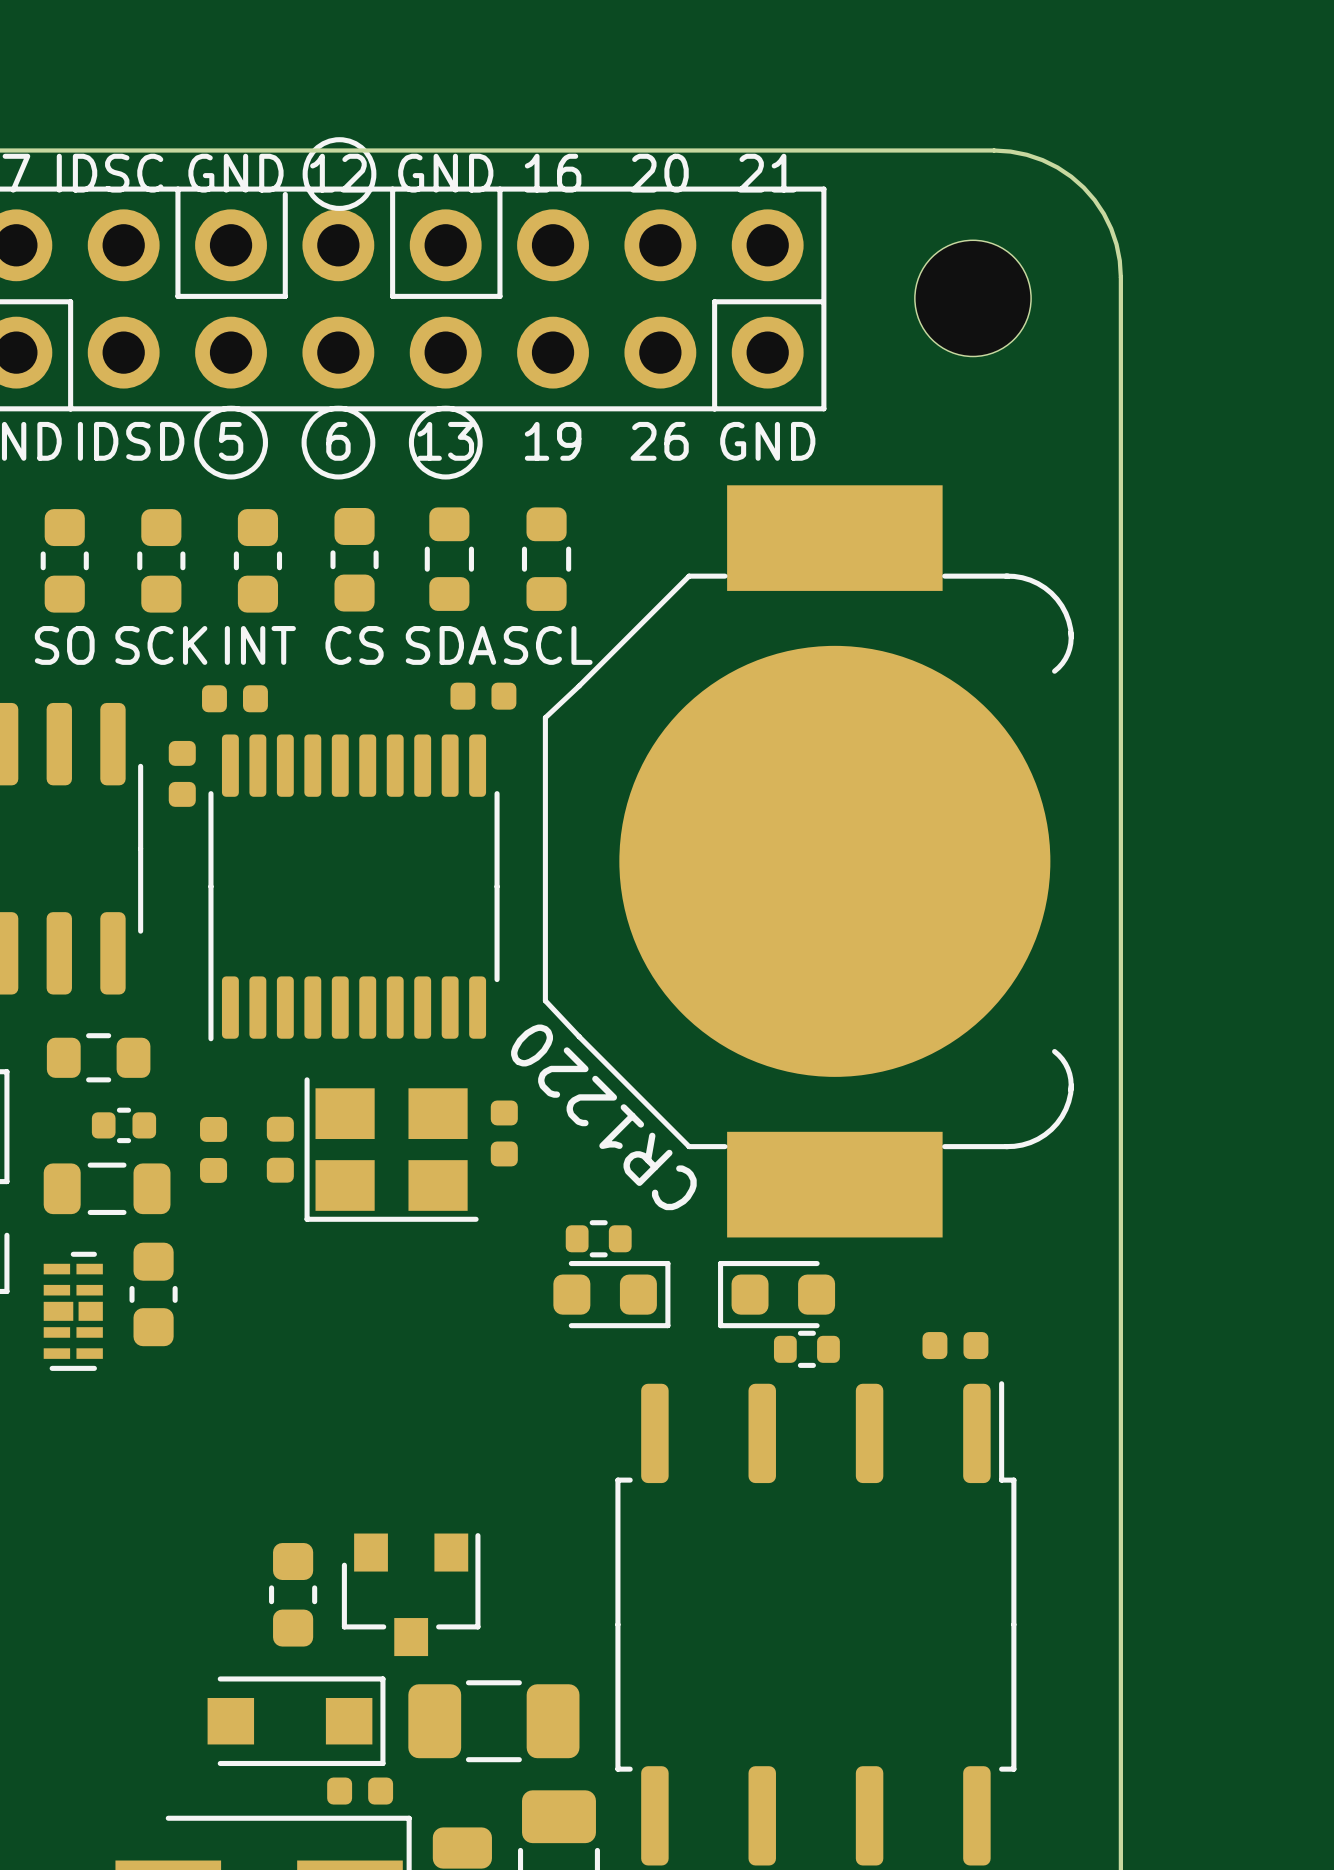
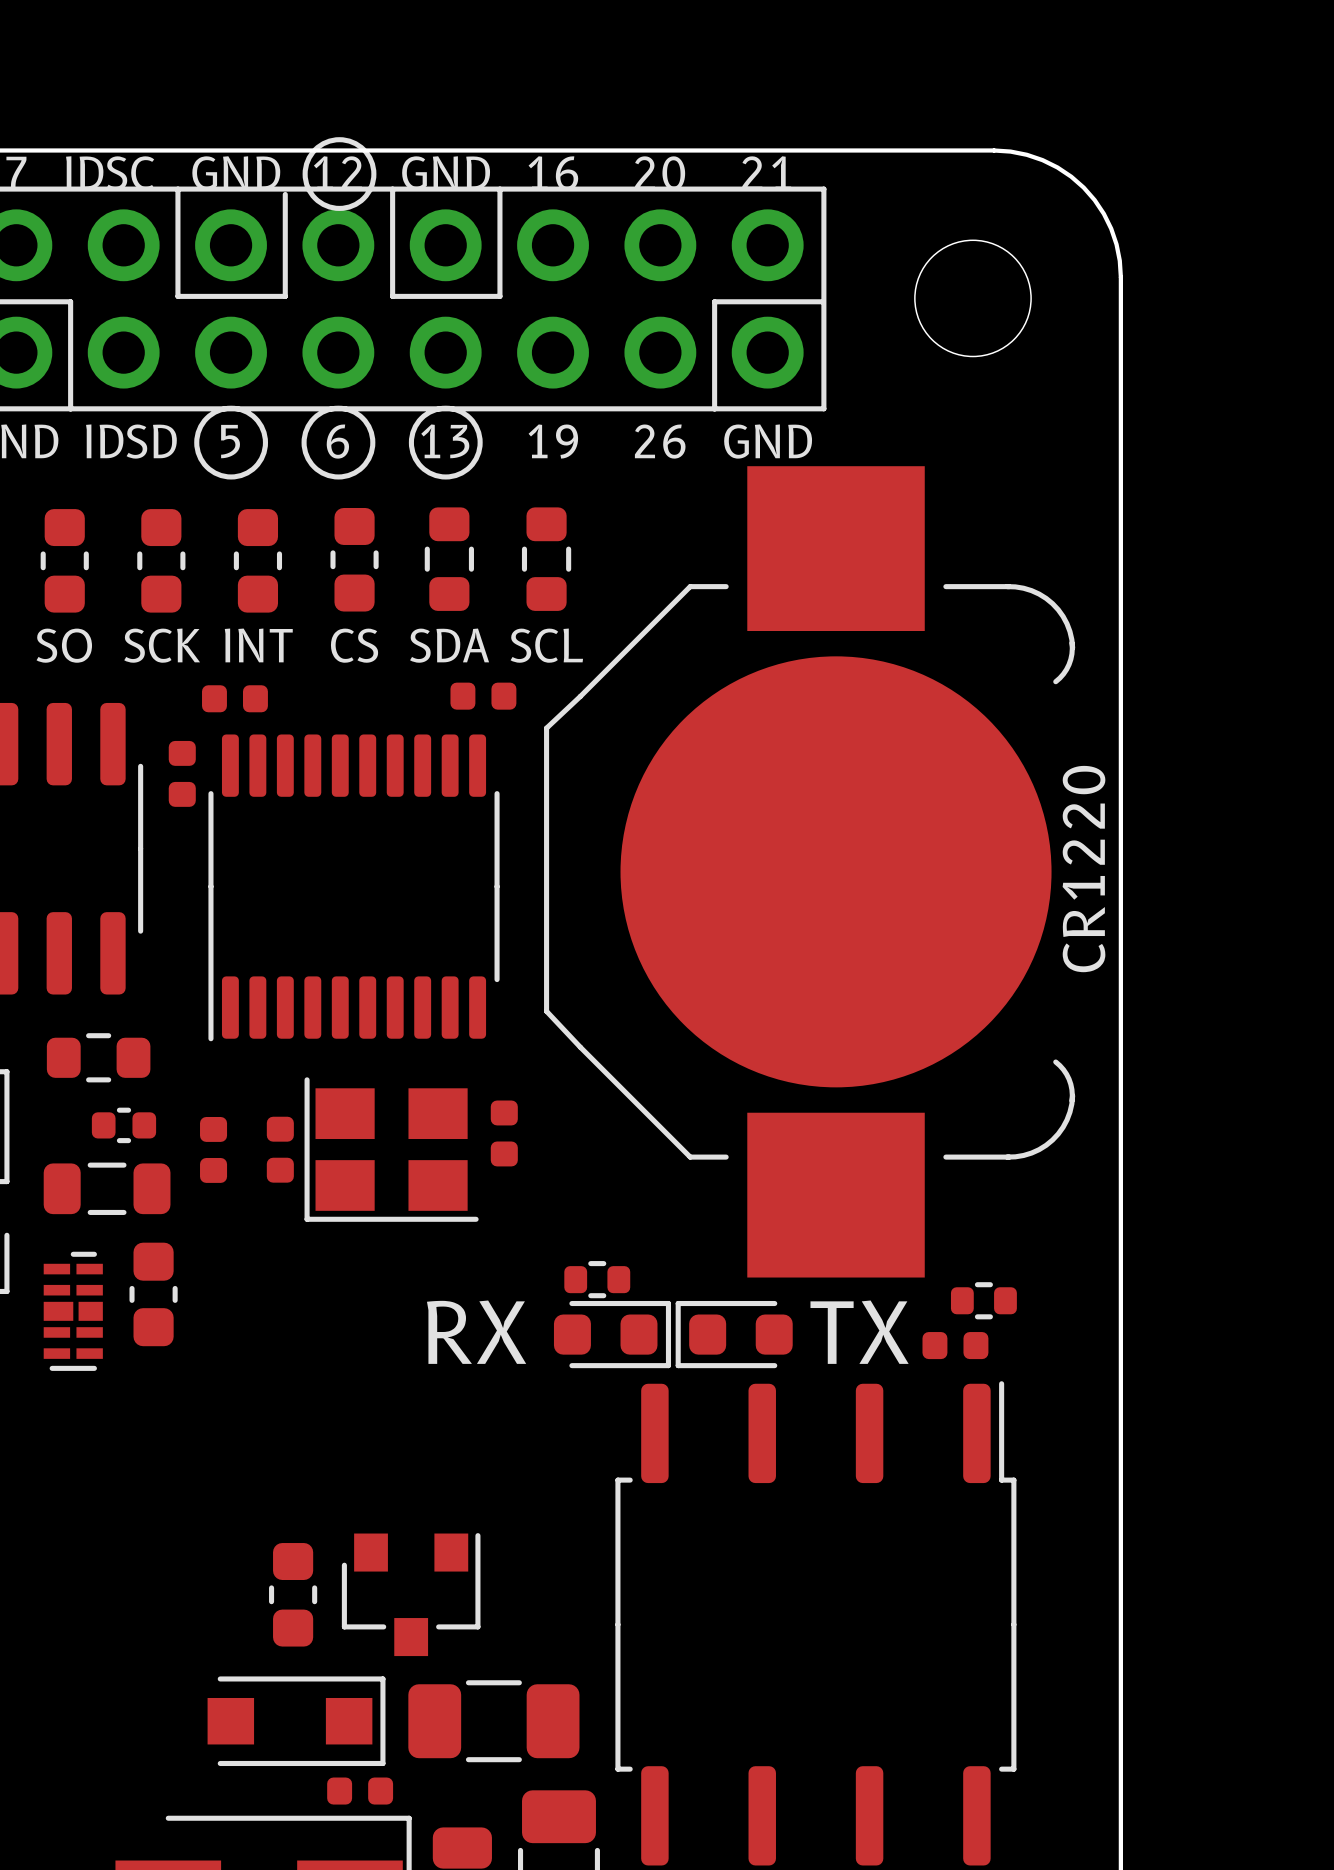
part footprint: [542, 485, 1075, 1238] -> [544, 466, 1076, 1278]
text rotation: 0° (603, 1117) -> 45° clockwise (1083, 869)
text position: CR1220 (603, 1117) -> CR1220 (1083, 869)
part position: (598, 1238) -> (597, 1279)
part position: (611, 1294) -> (612, 1334)
part position: (776, 1294) -> (734, 1334)
part: none -> (983, 1300)
text: none -> RX (476, 1332)
text: none -> TX (859, 1332)
part: (806, 1349) -> none

